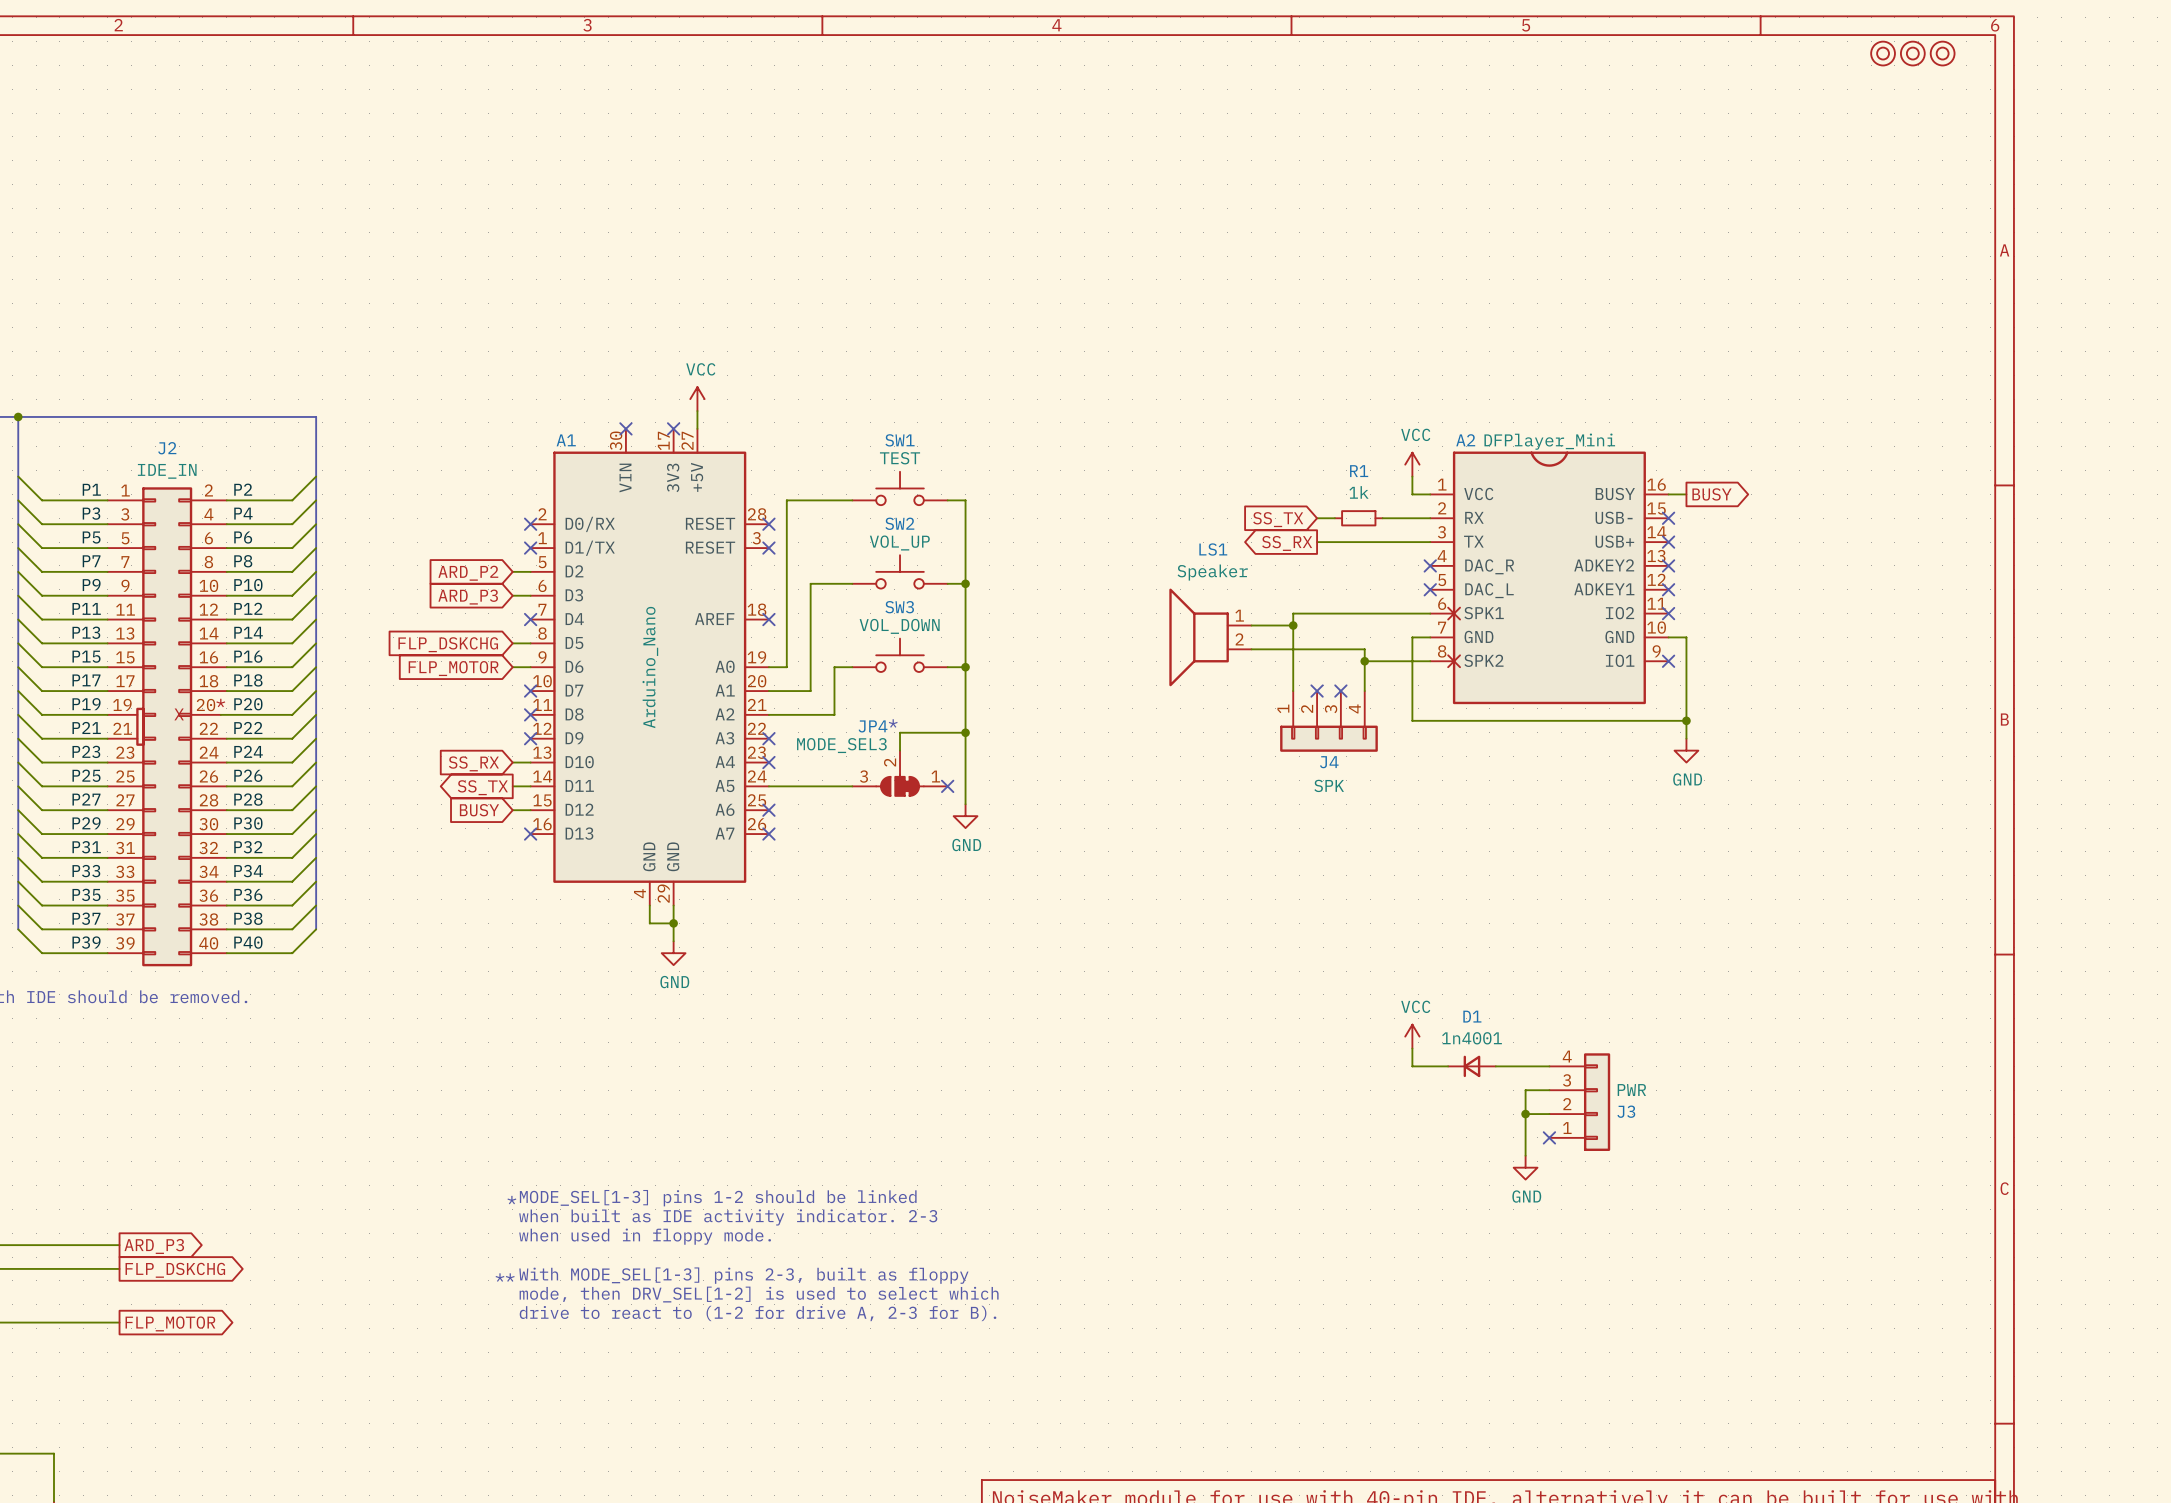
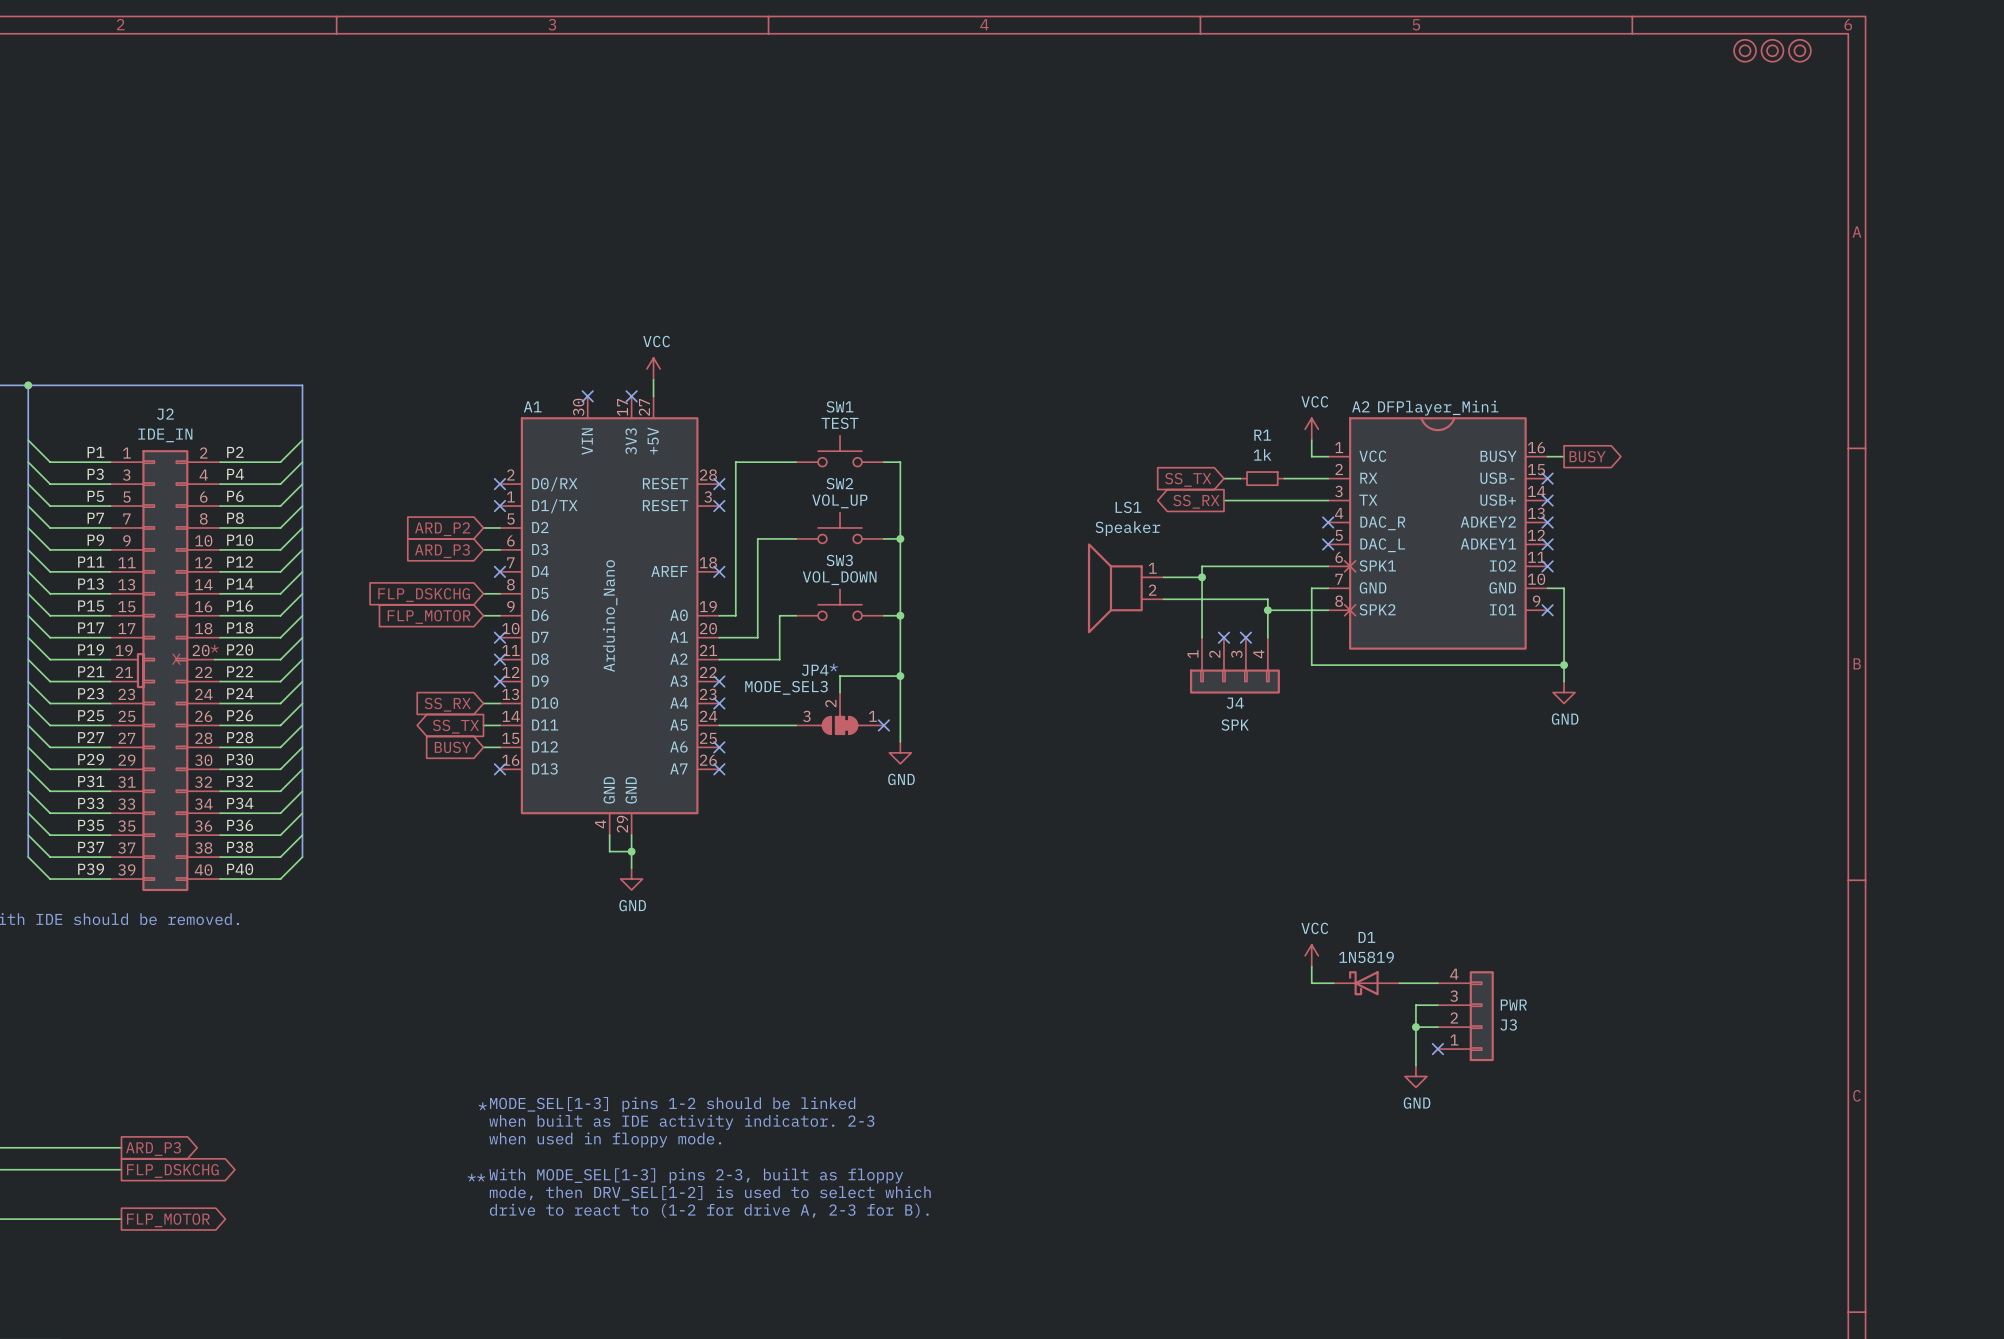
D1 value: 1n4001 (1472, 1038) -> 1N5819 (1366, 957)
D1 symbol: [1448, 1055, 1496, 1078] -> [1333, 971, 1400, 996]

